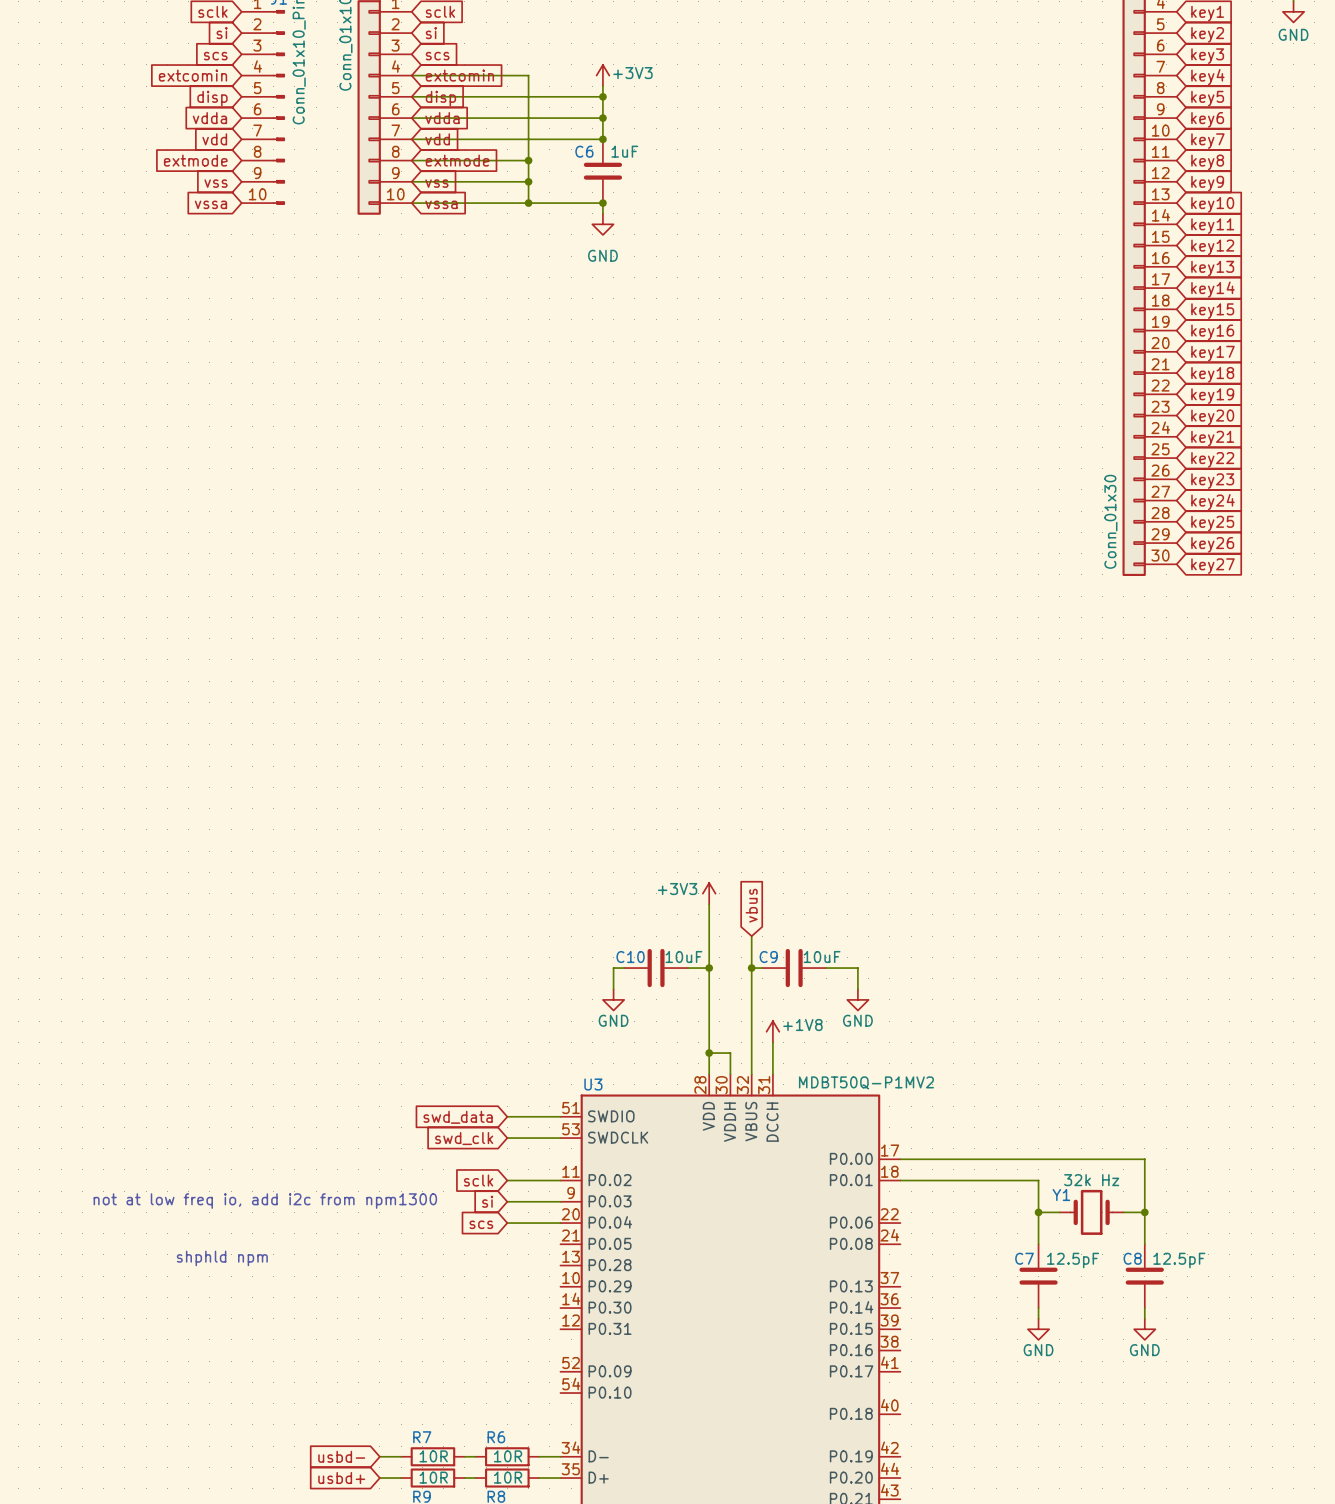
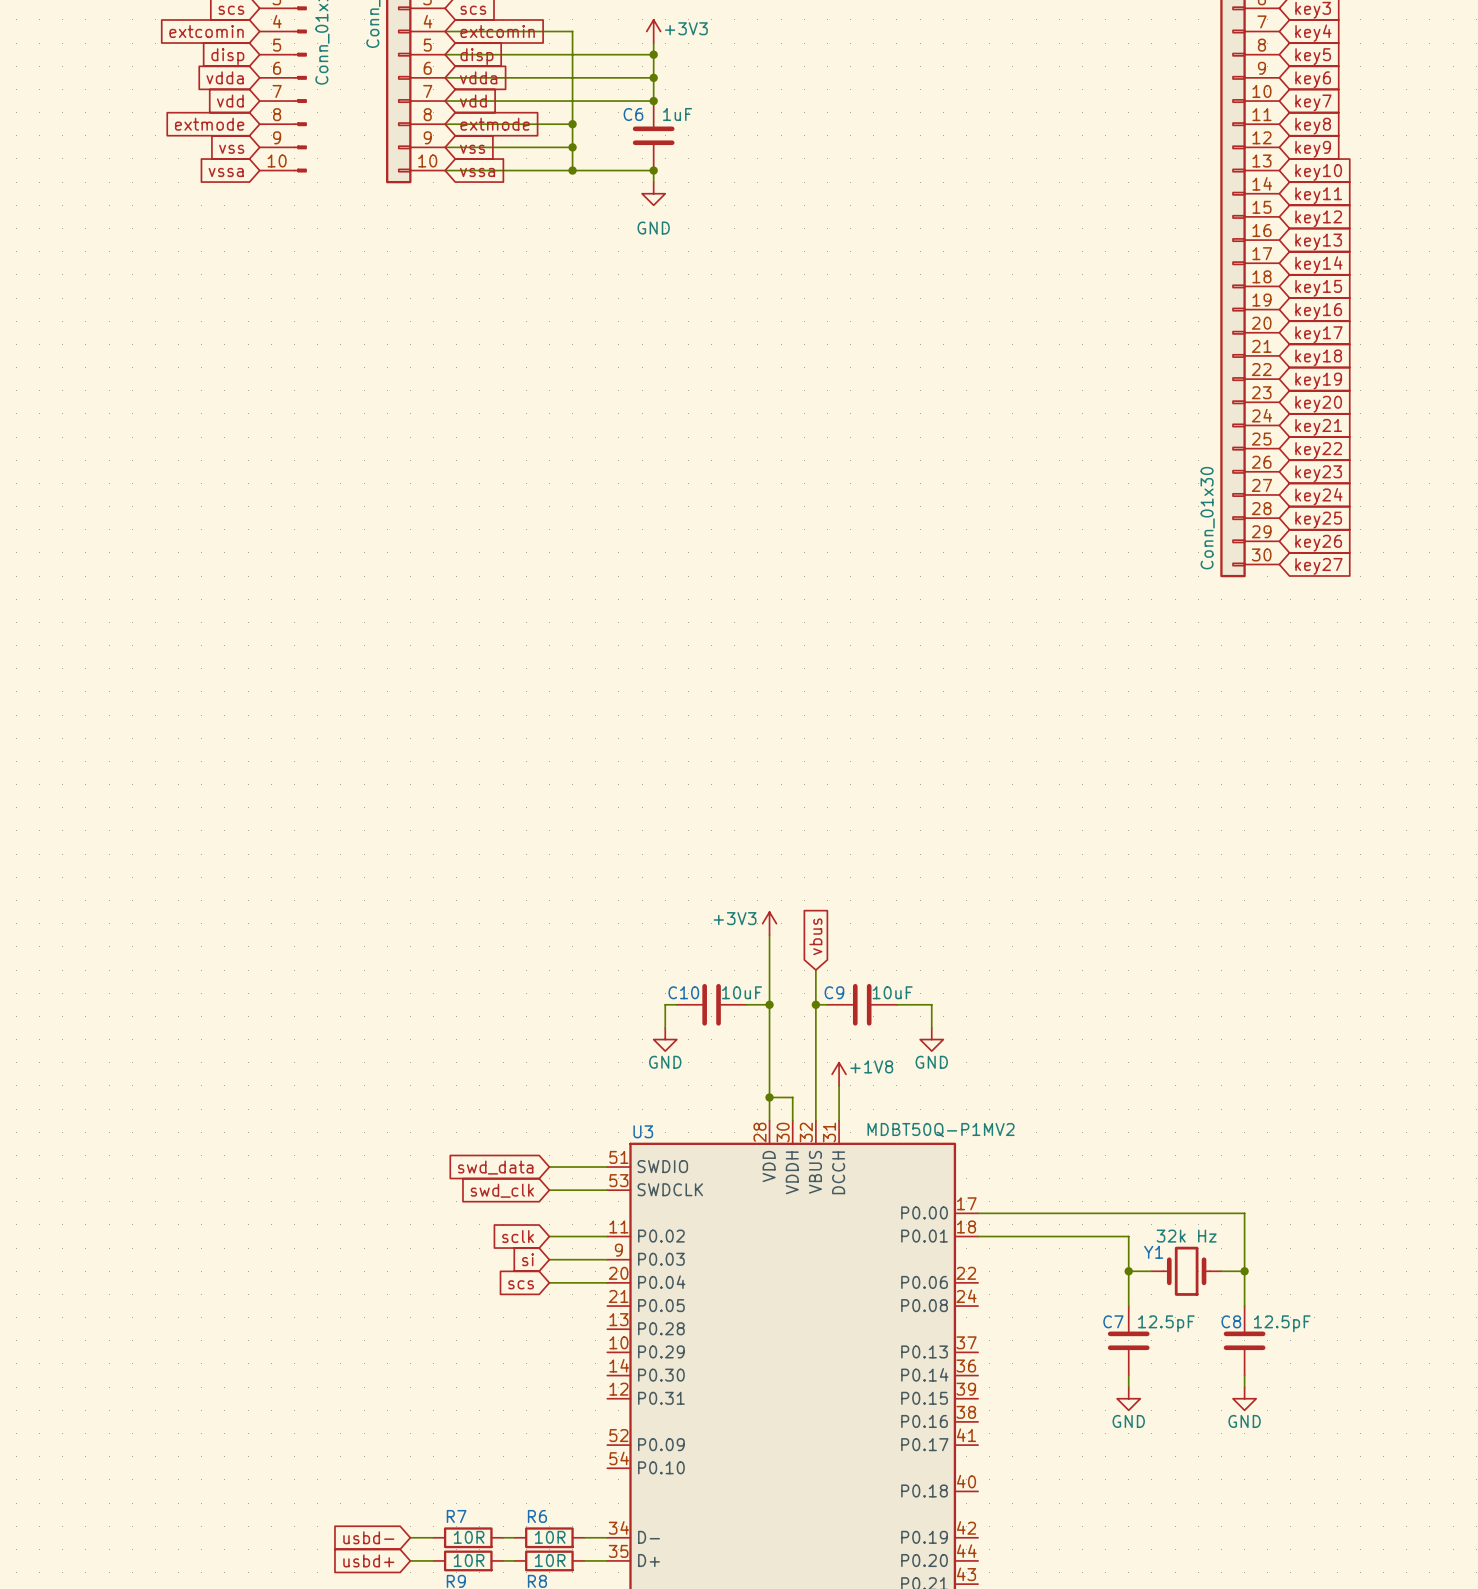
text: not at low freq io, add i2c from npm1300 (265, 1201) -> none
text: shphld npm (222, 1258) -> none

